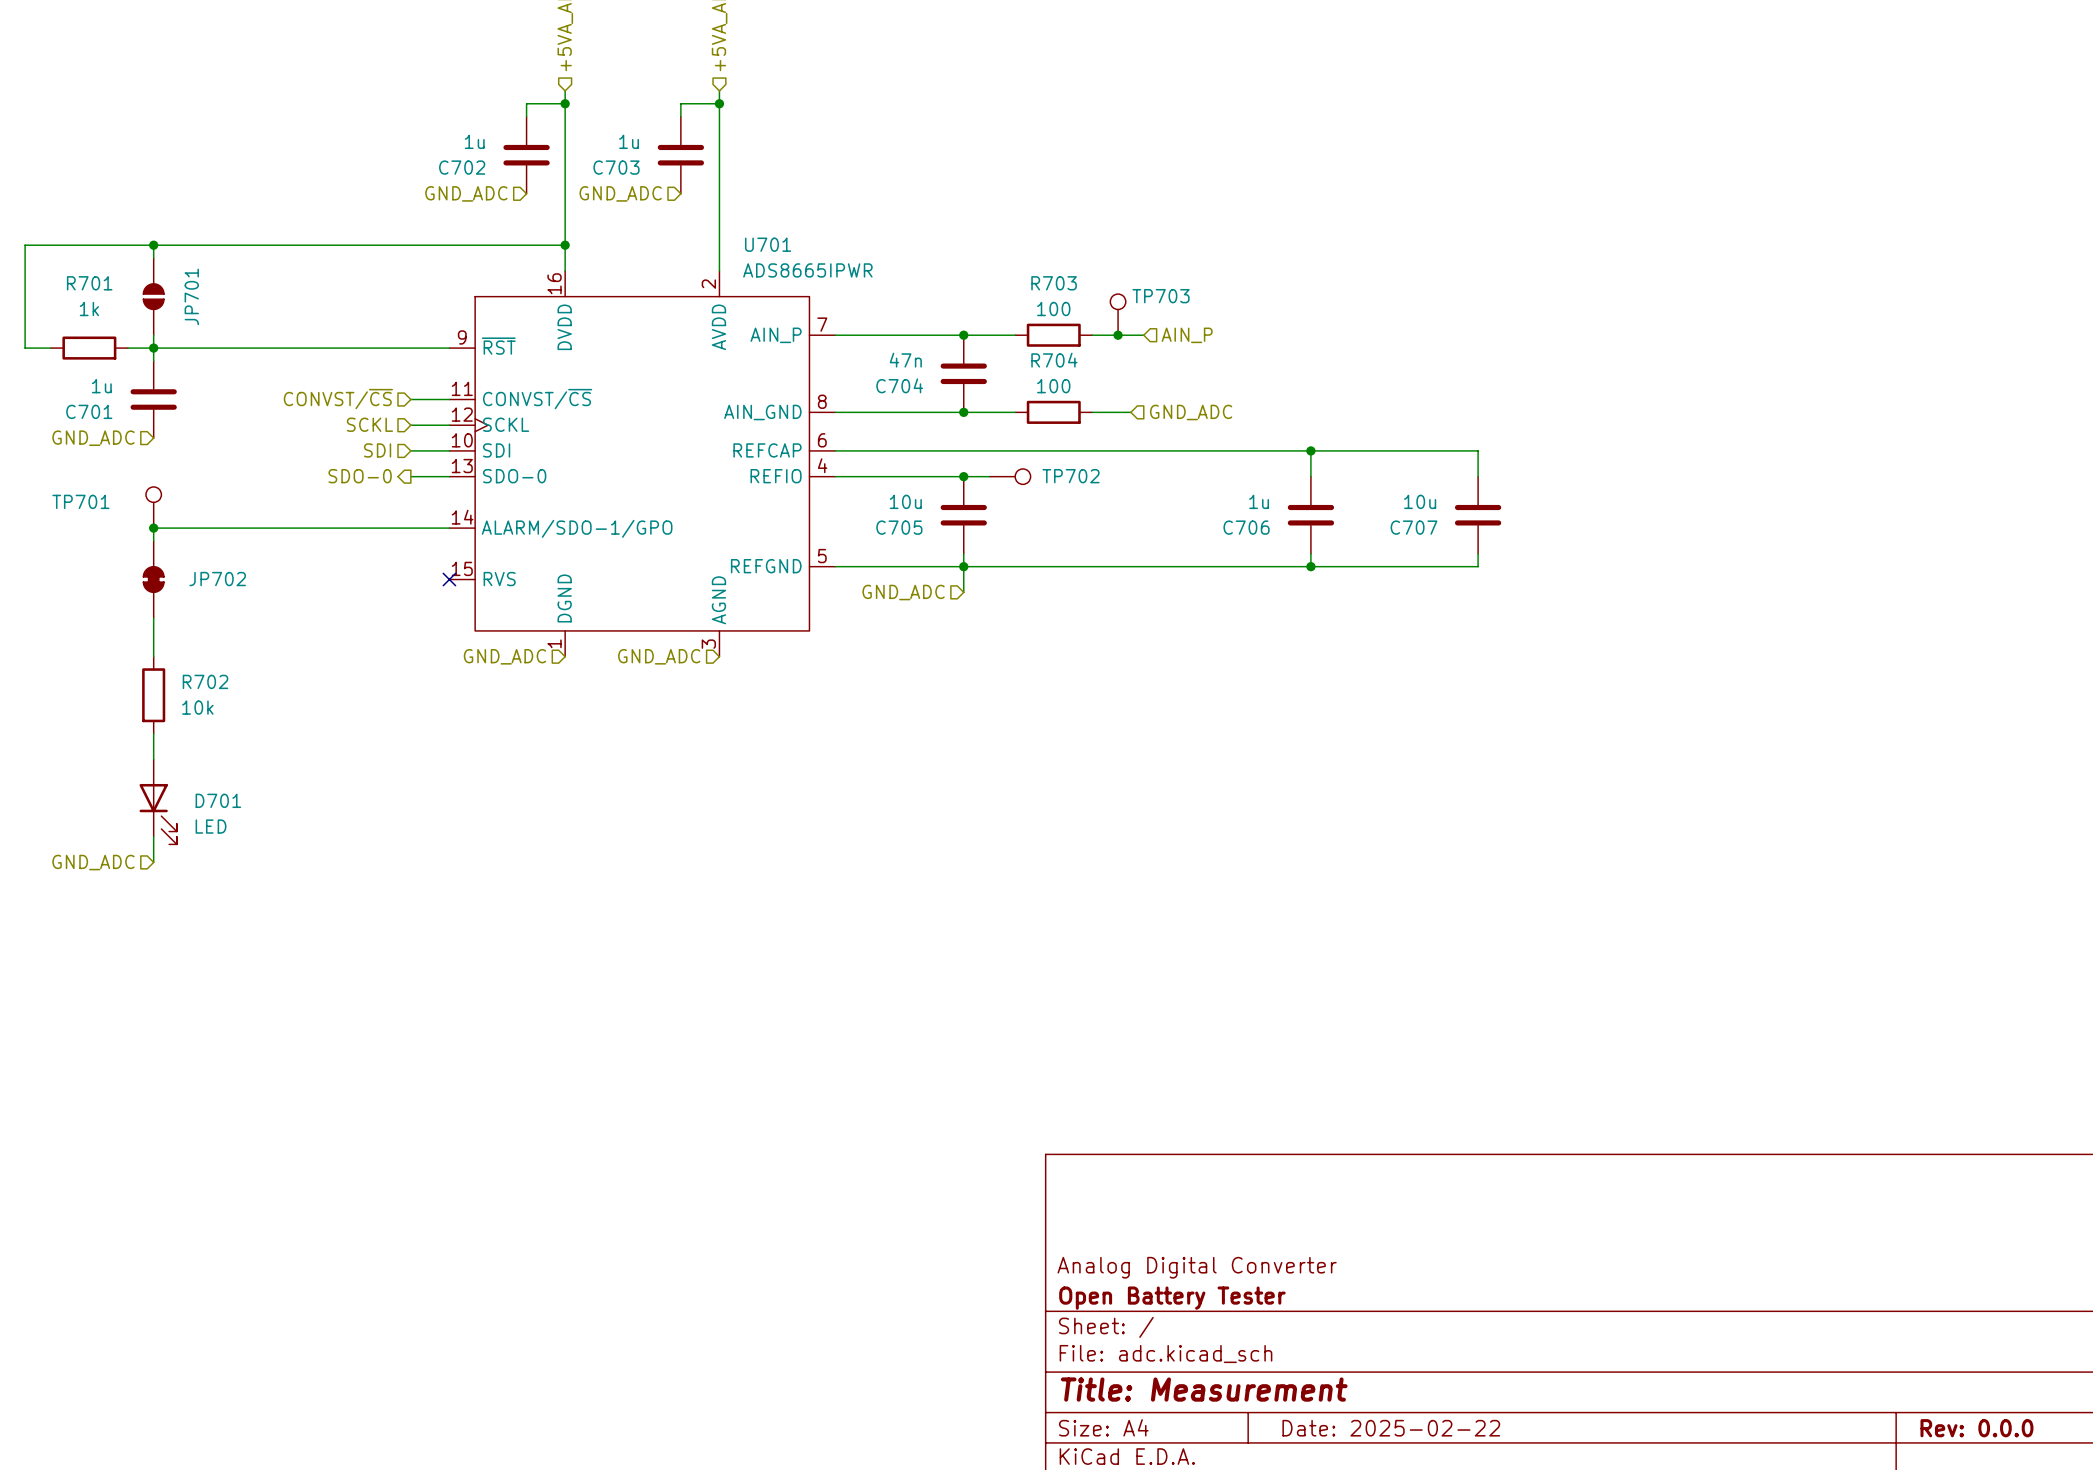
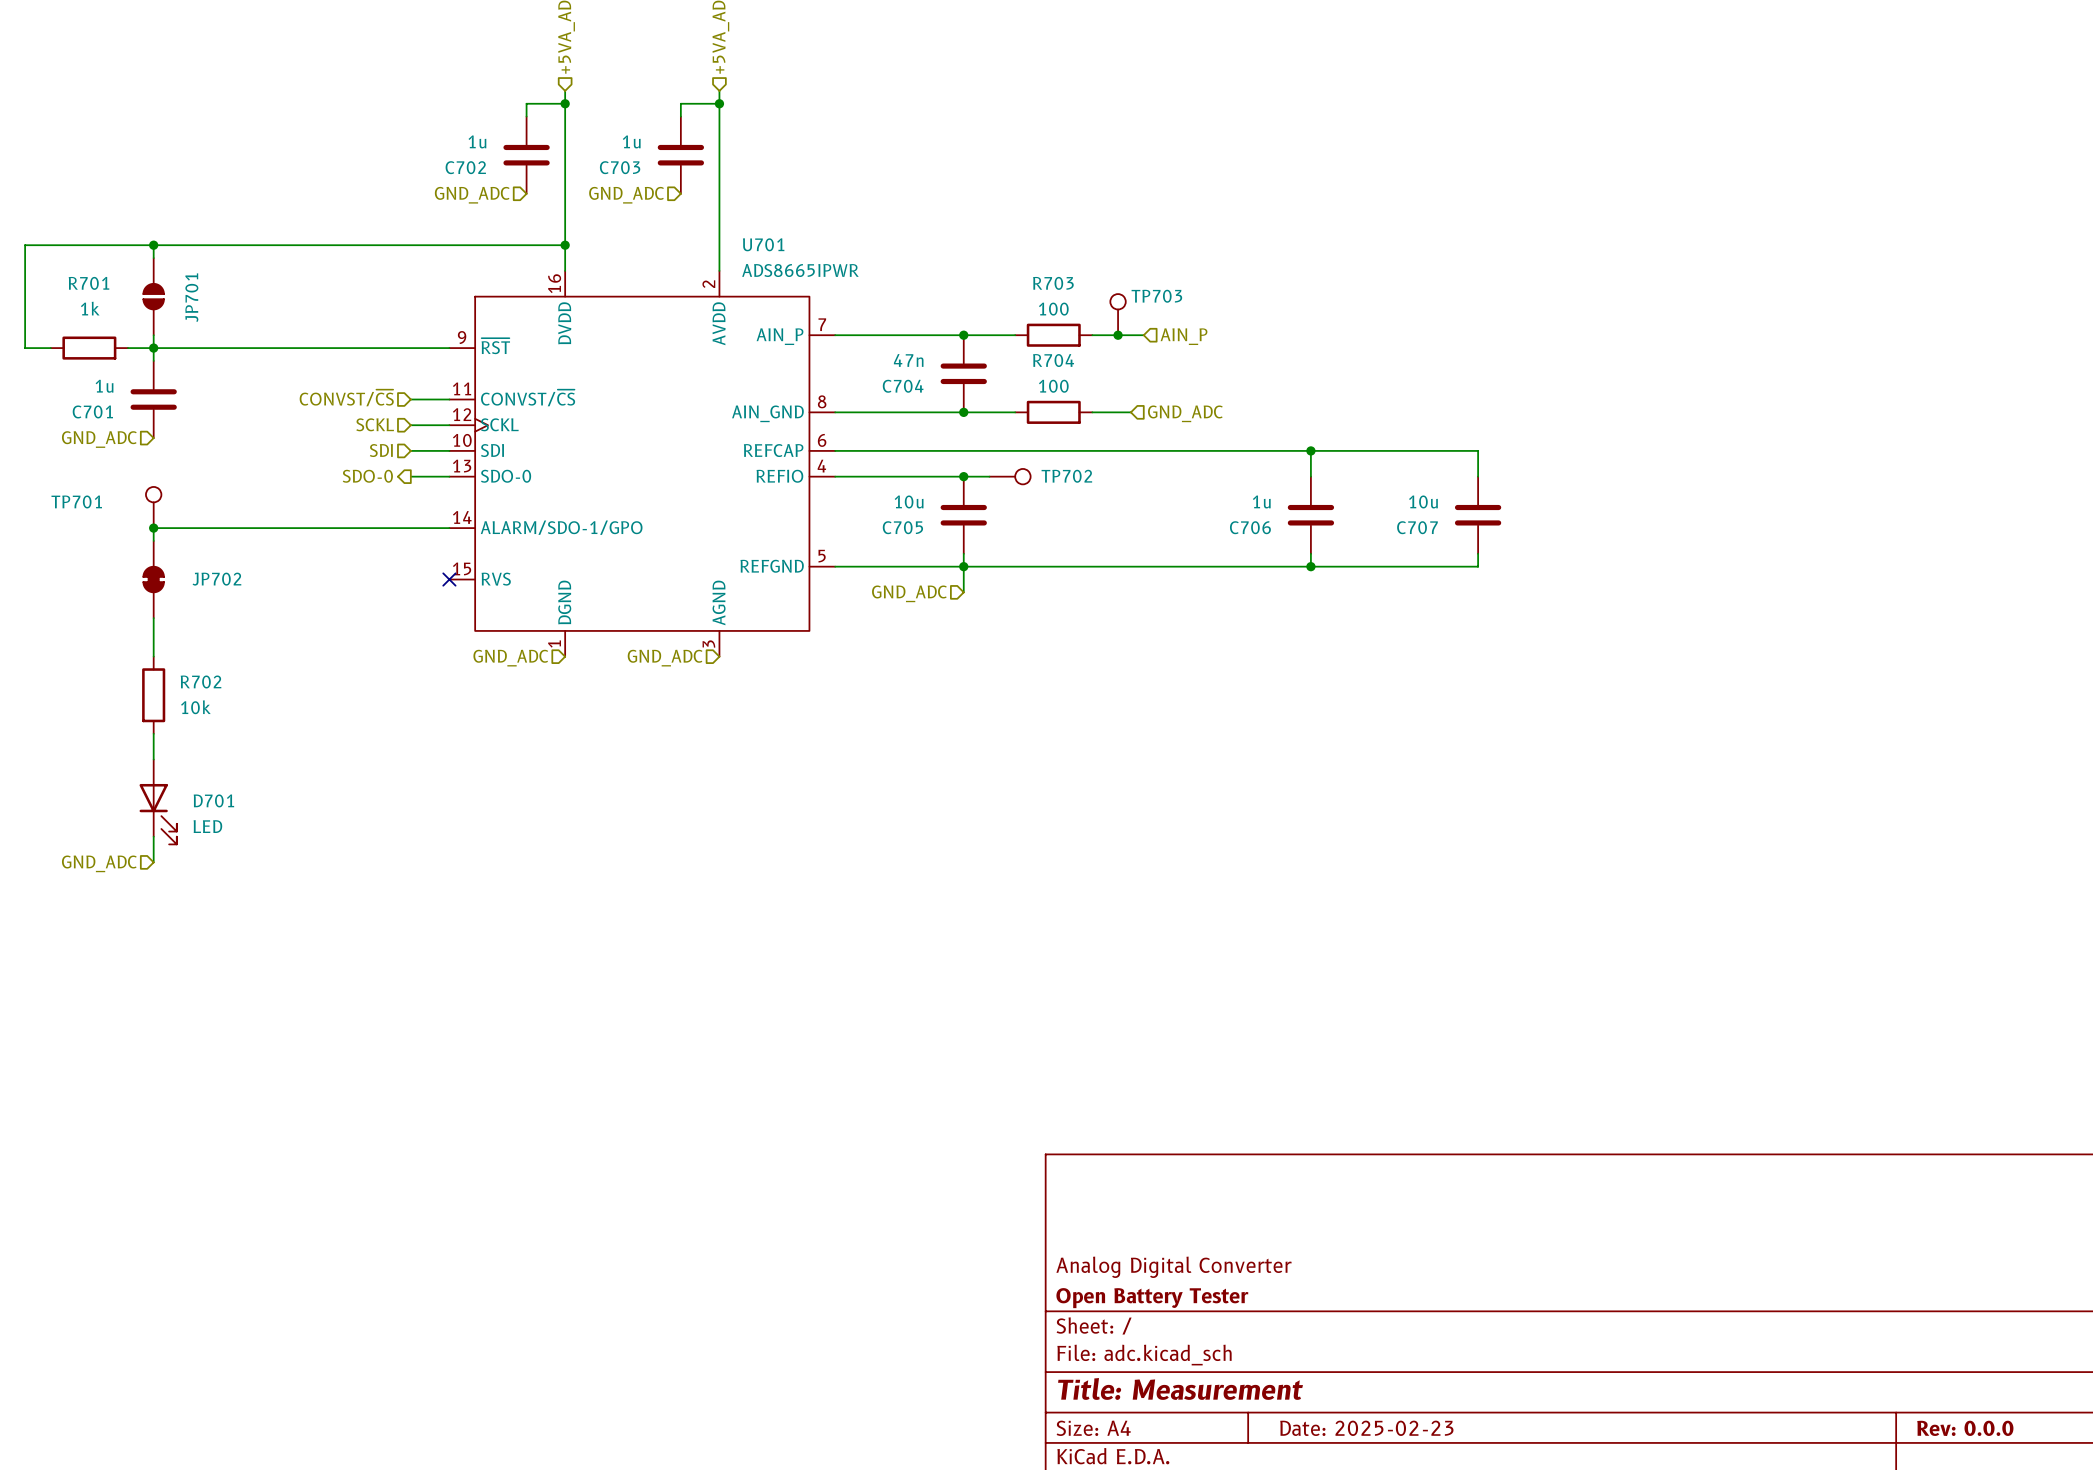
title block: Date: 2025-02-22 (1391, 1428) -> Date: 2025-02-23 (1366, 1428)

